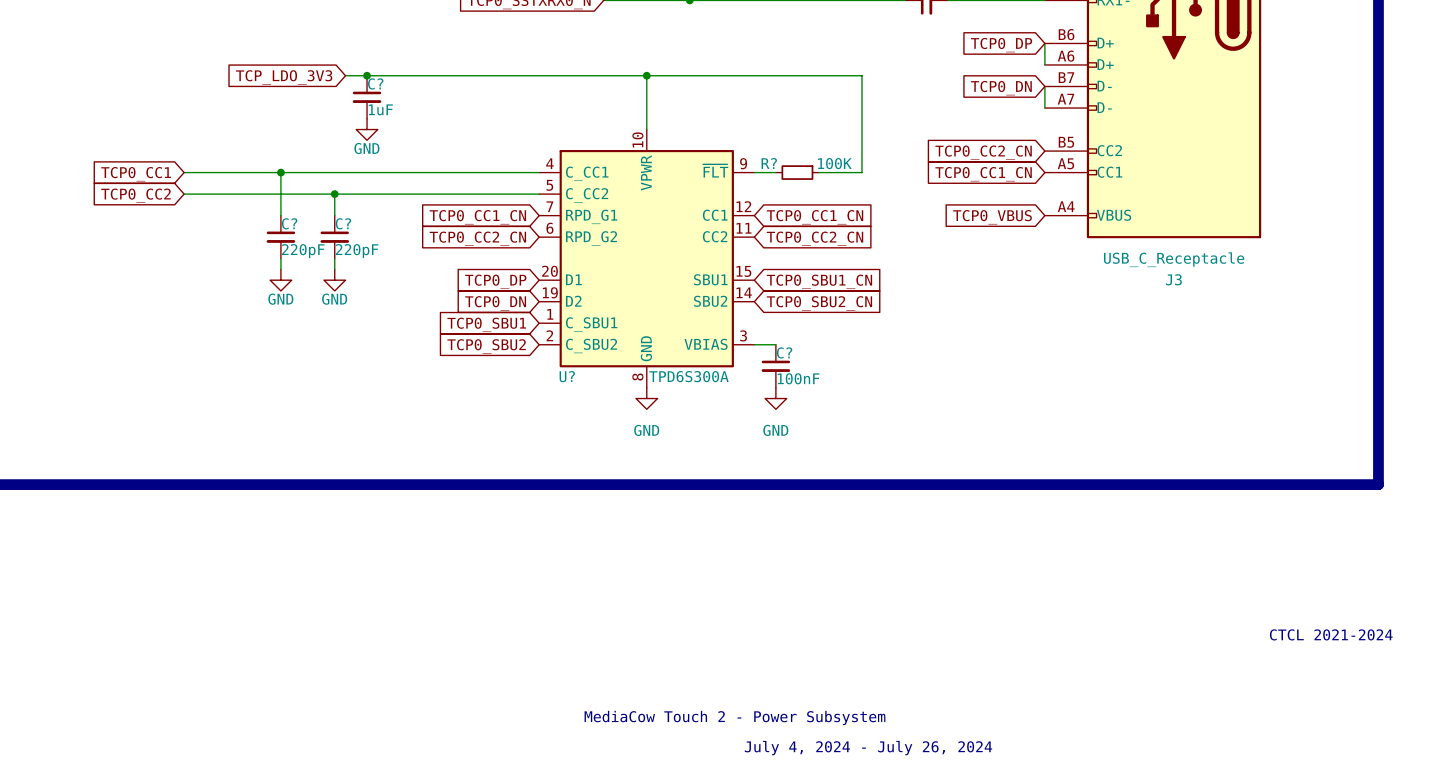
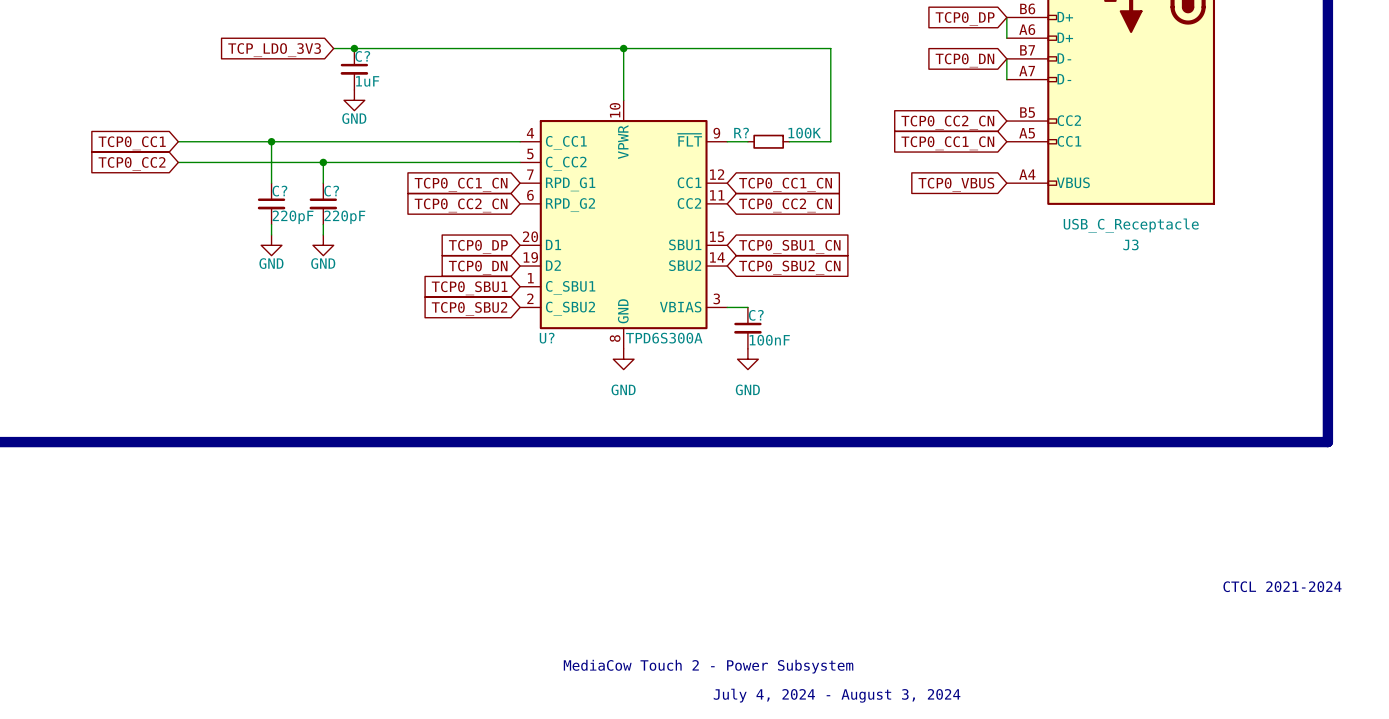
text: July 4, 2024 - July 26, 2024 (868, 748) -> July 4, 2024 - August 3, 2024 (837, 695)

